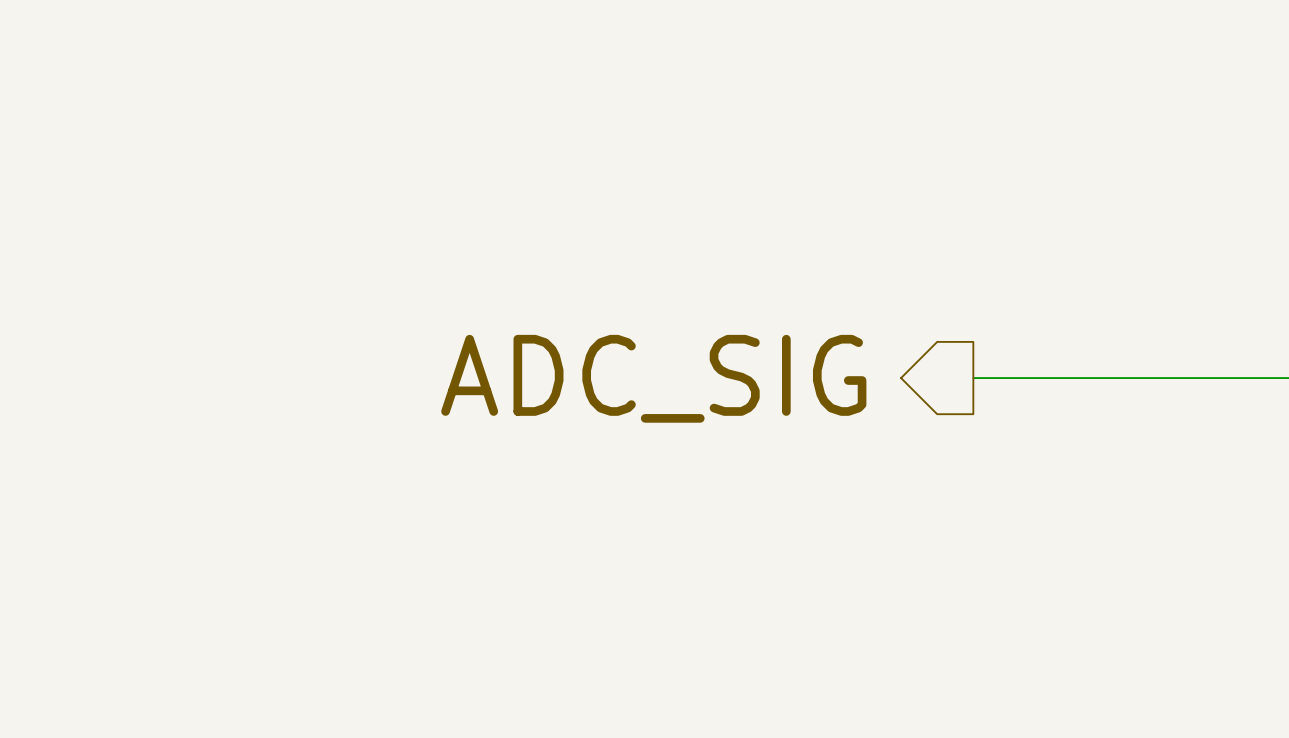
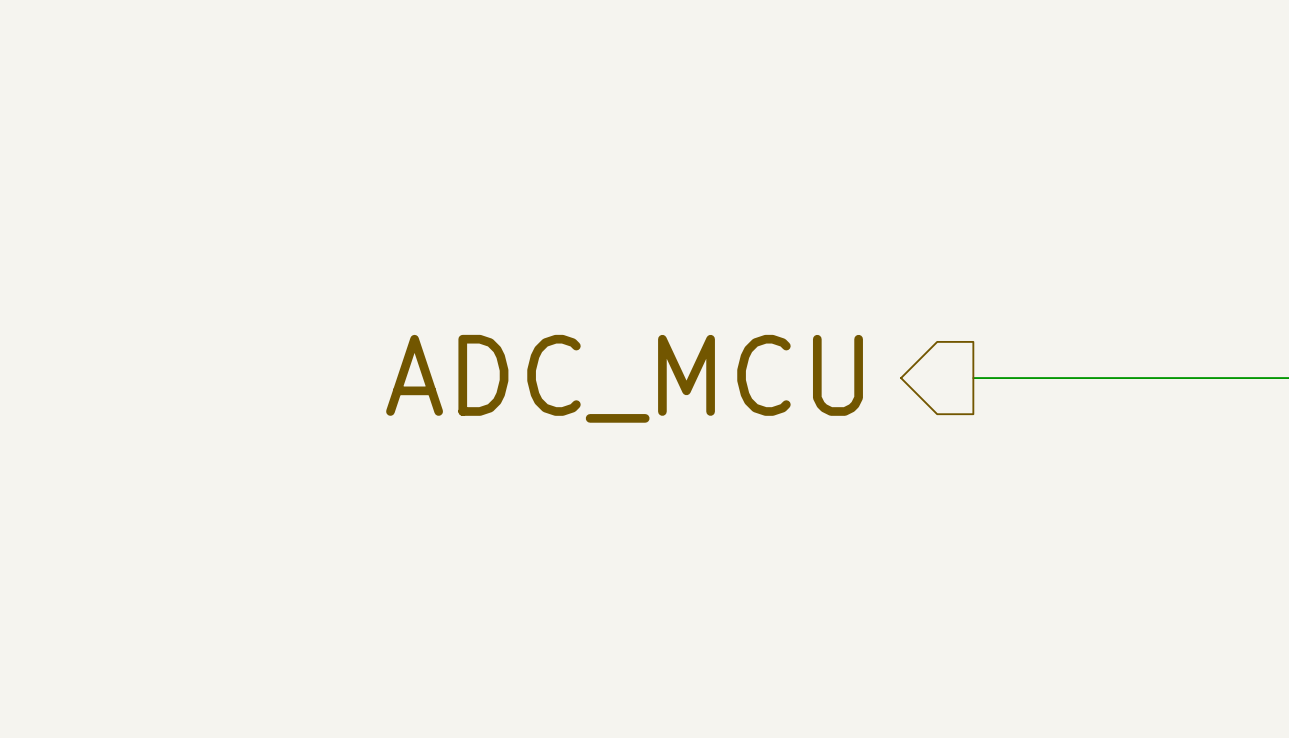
hierarchical label: ADC_SIG (653, 378) -> ADC_MCU (624, 378)

